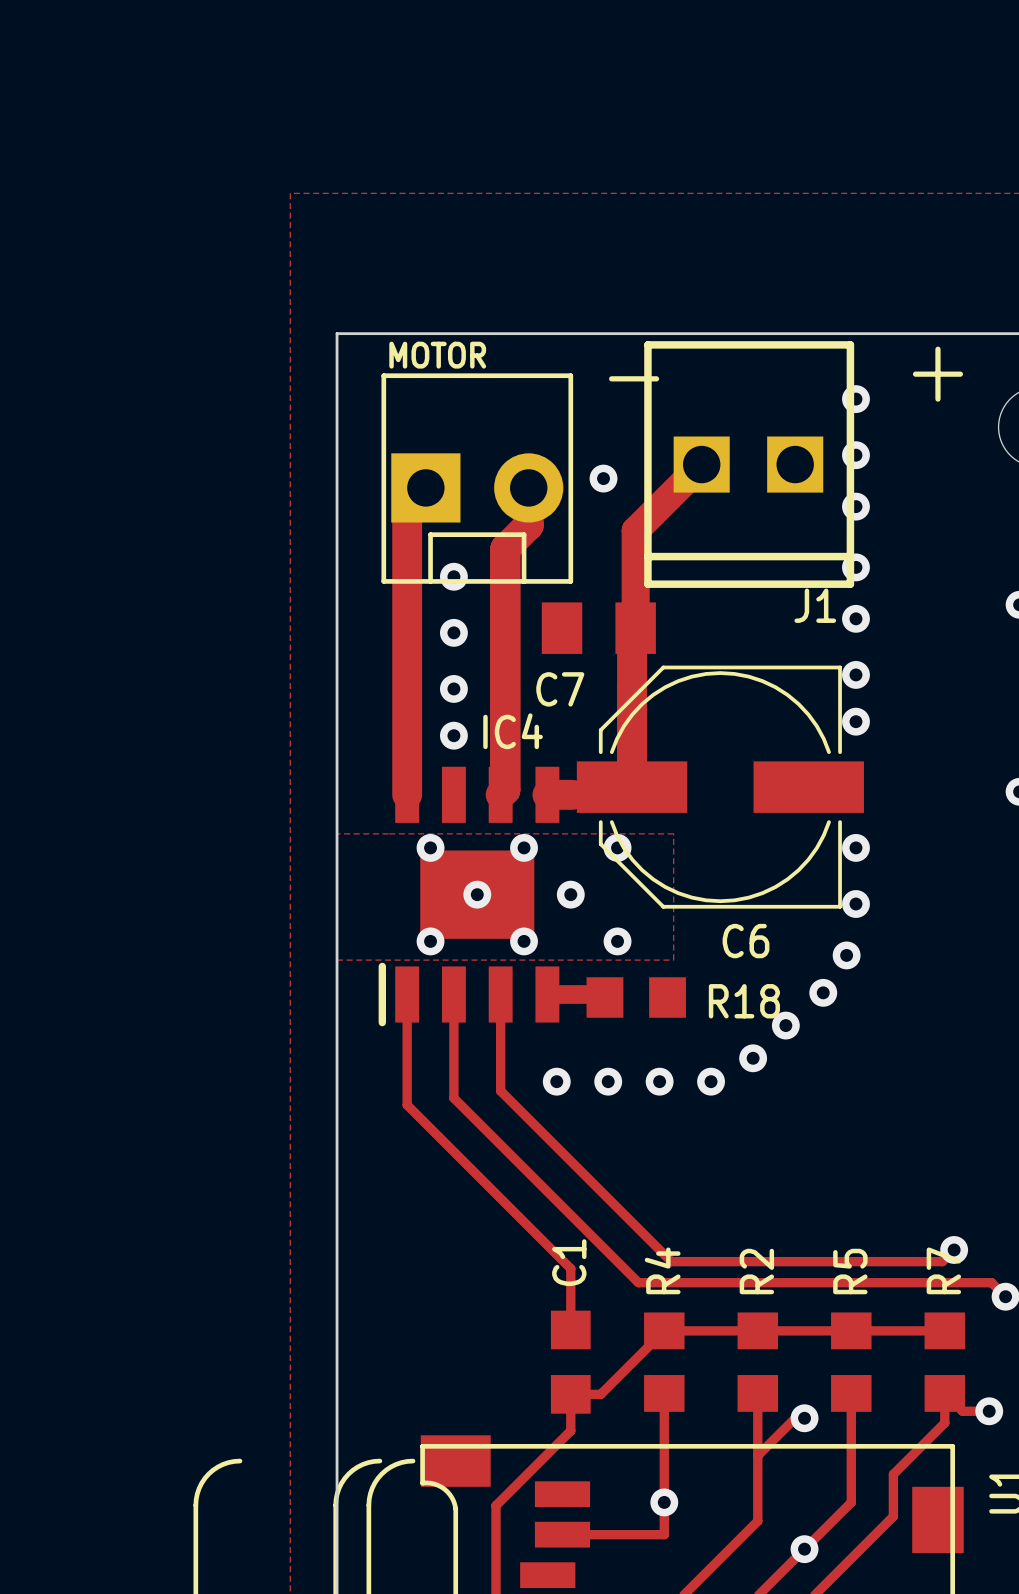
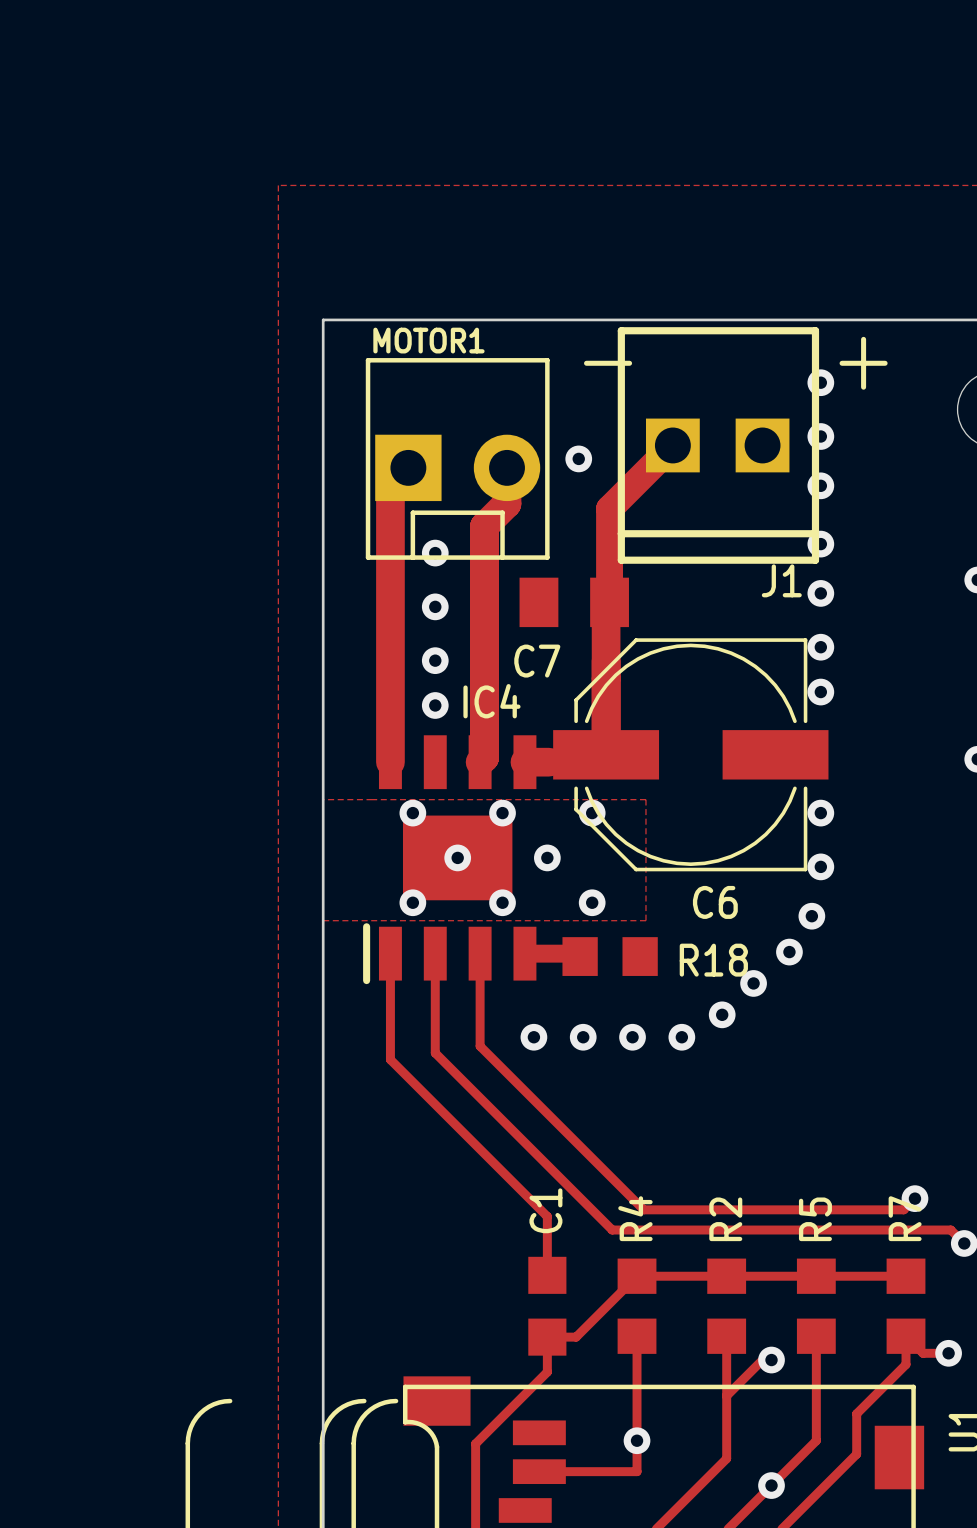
MOTOR name: MOTOR (437, 355) -> MOTOR1 (428, 340)
text position: + (937, 374) -> + (863, 363)

